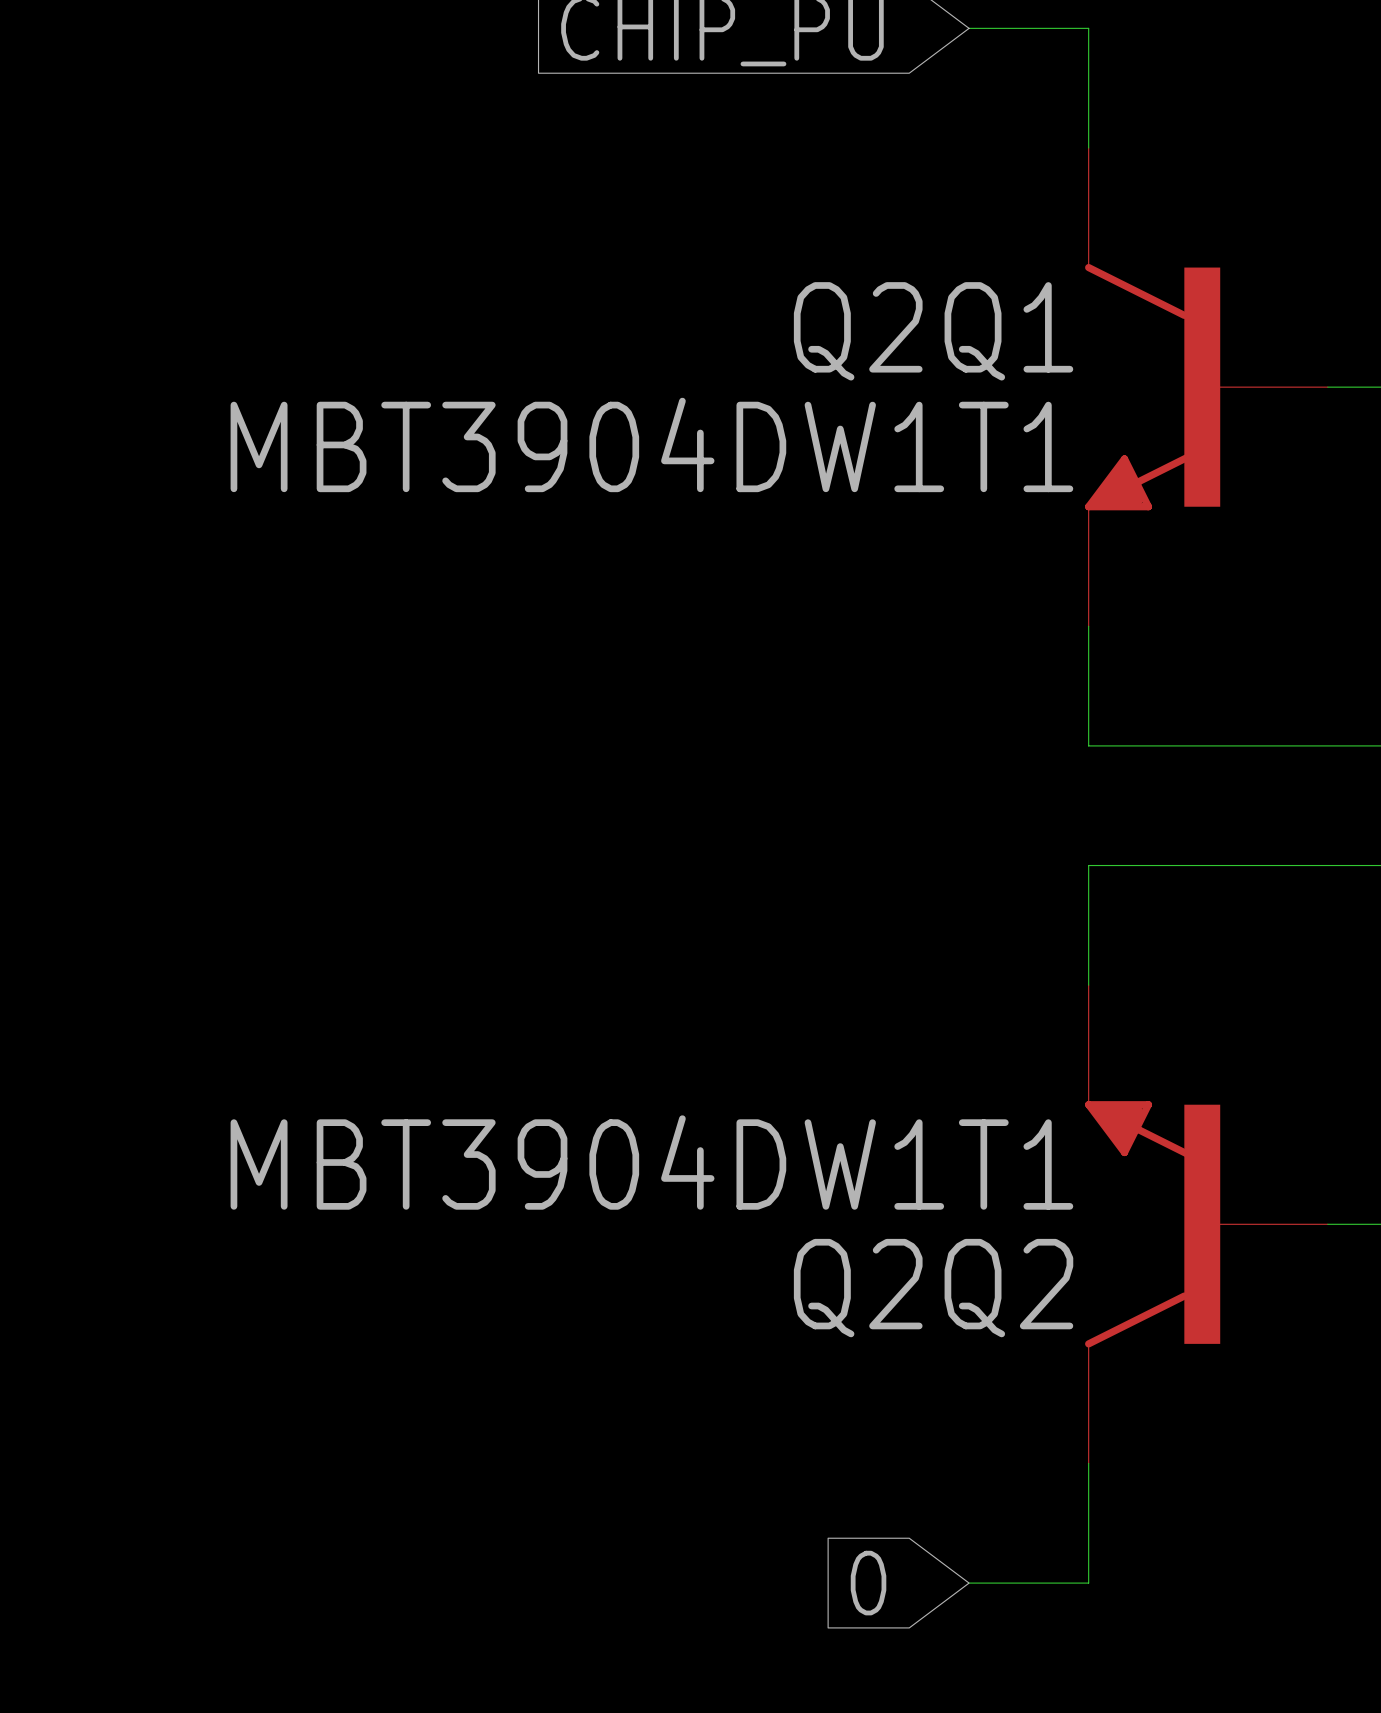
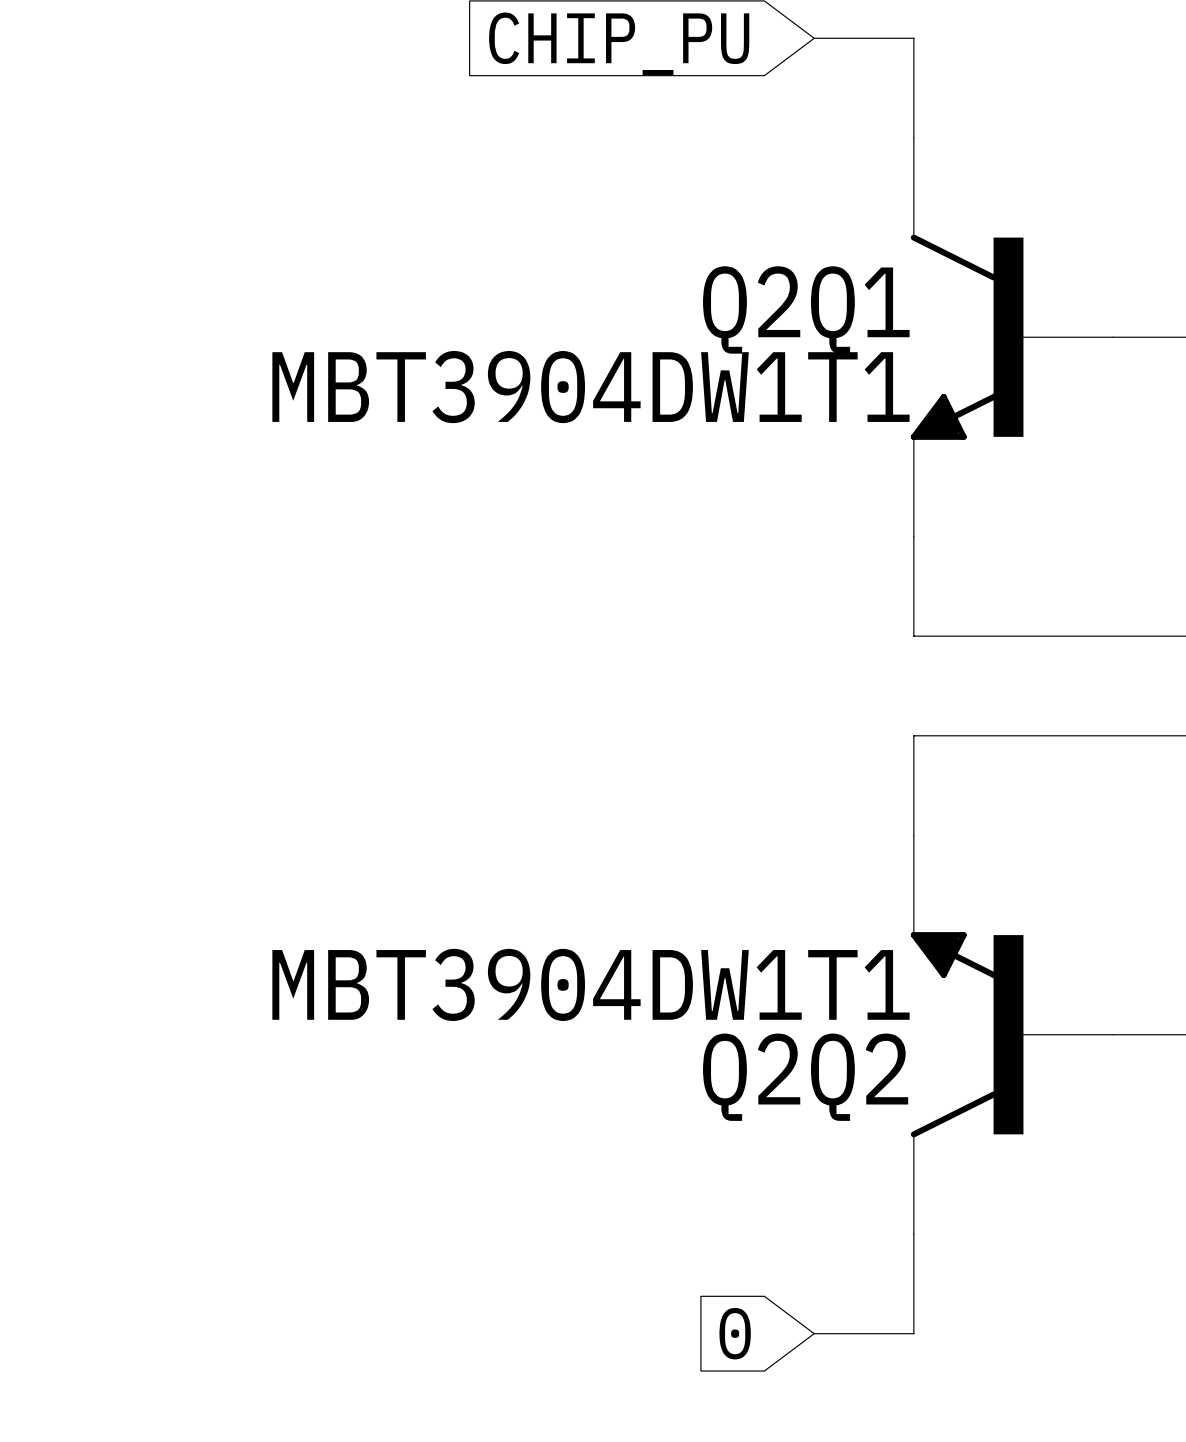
Q2Q1 name position: Q2Q1 (933, 331) -> Q2Q1 (806, 309)
Q2Q2 name position: Q2Q2 (933, 1288) -> Q2Q2 (805, 1077)

